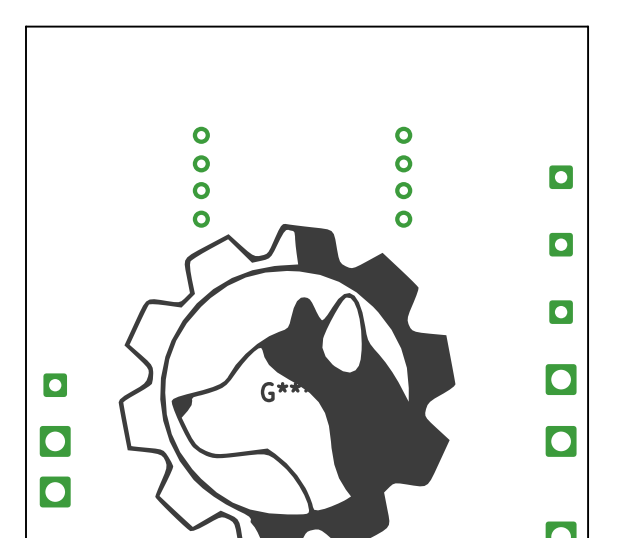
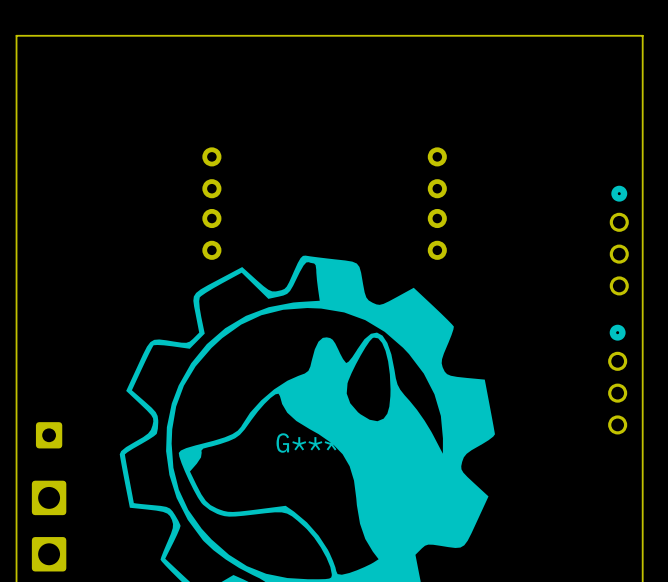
part: (561, 177) -> none
part: none -> (619, 240)
part: (561, 244) -> none
part: (561, 312) -> none
part: none -> (617, 379)
part: (561, 379) -> none
part: (561, 441) -> none

